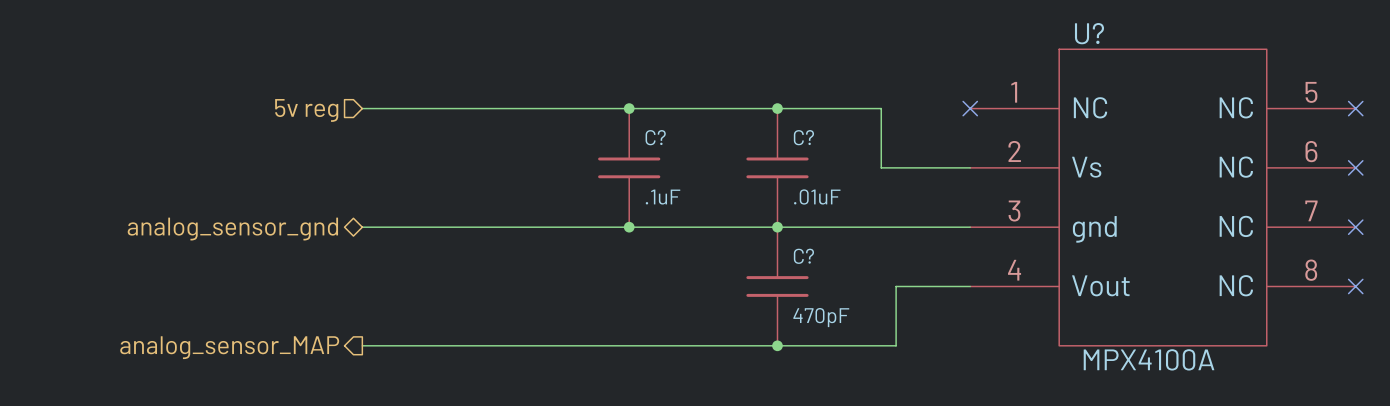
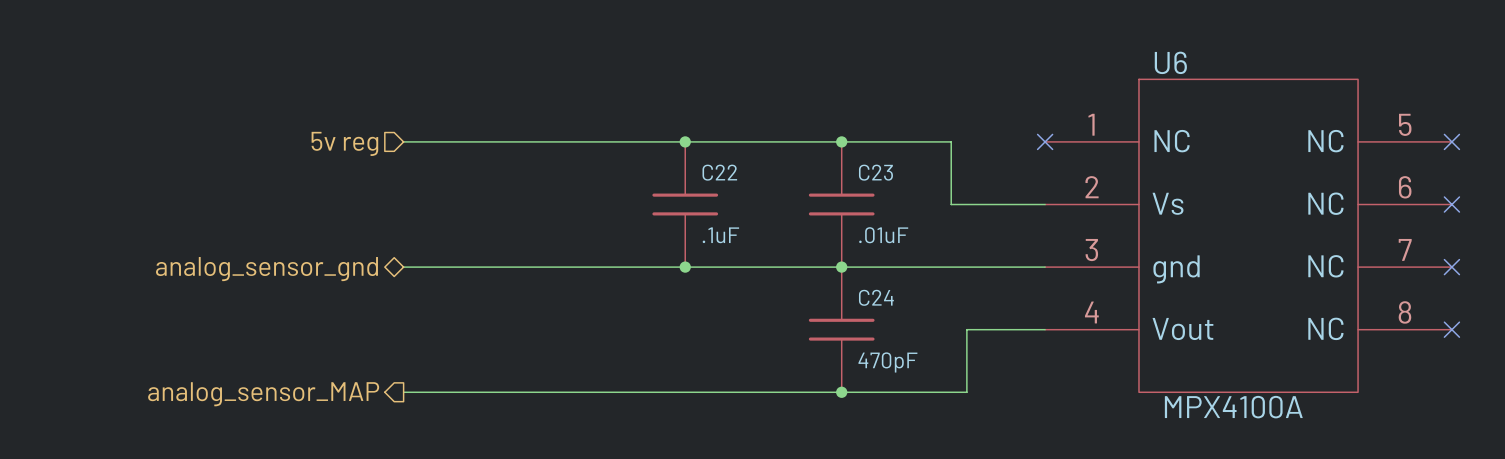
U? name: U? (1089, 33) -> U6 (1170, 62)
C? name: C? (655, 137) -> C22 (719, 172)
C? name: C? (803, 137) -> C23 (875, 172)
C? name: C? (803, 256) -> C24 (876, 297)

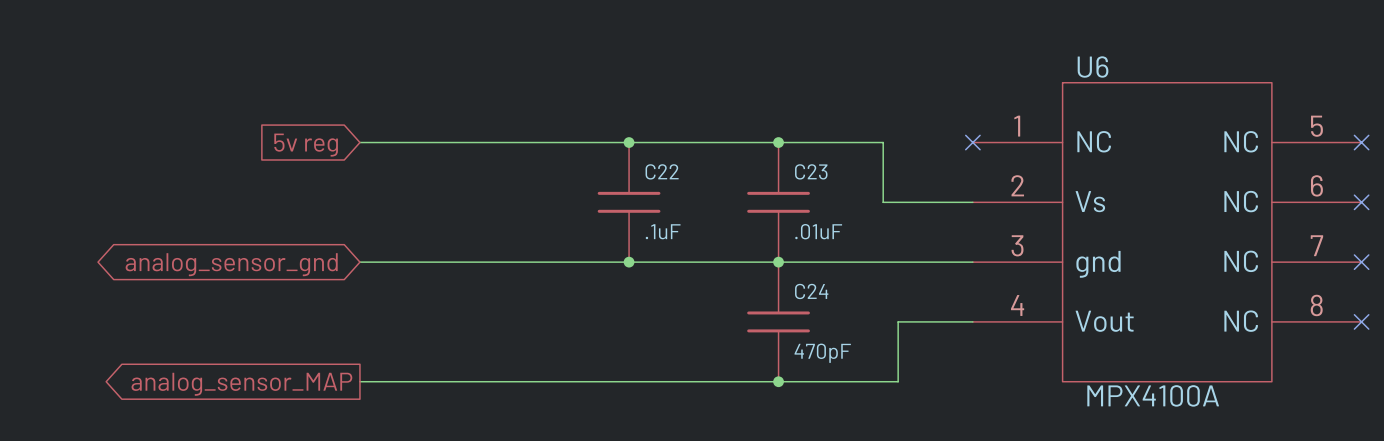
hierarchical label: 5v reg (344, 143) -> none
global label: none -> 5v reg (306, 145)
hierarchical label: analog_sensor_gnd (266, 269) -> none
global label: none -> analog_sensor_gnd (231, 264)
hierarchical label: analog_sensor_MAP (263, 394) -> none
global label: none -> analog_sensor_MAP (241, 384)

